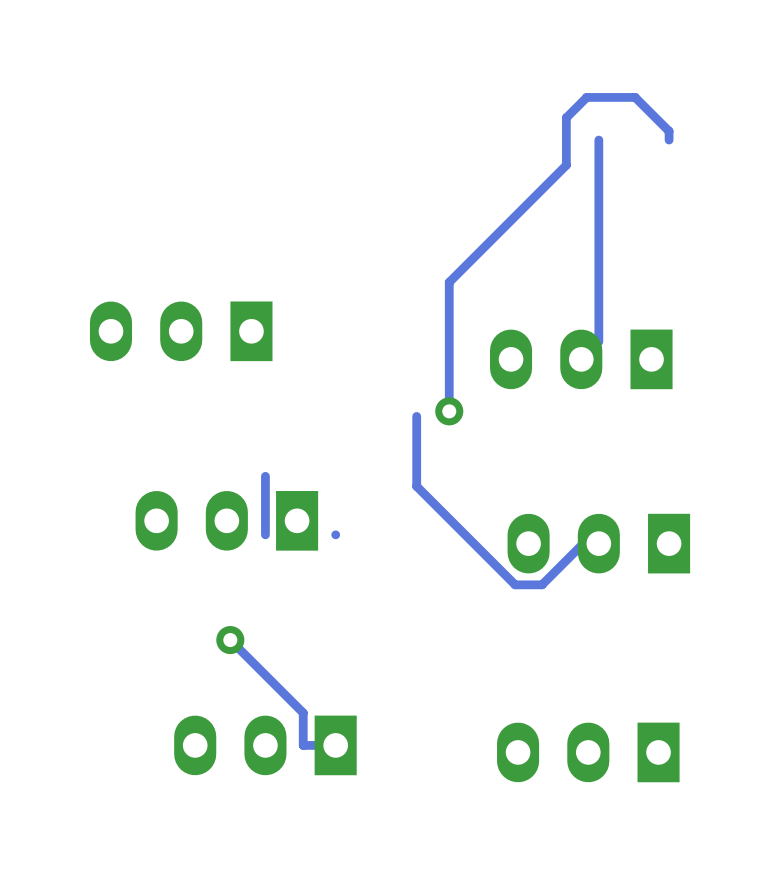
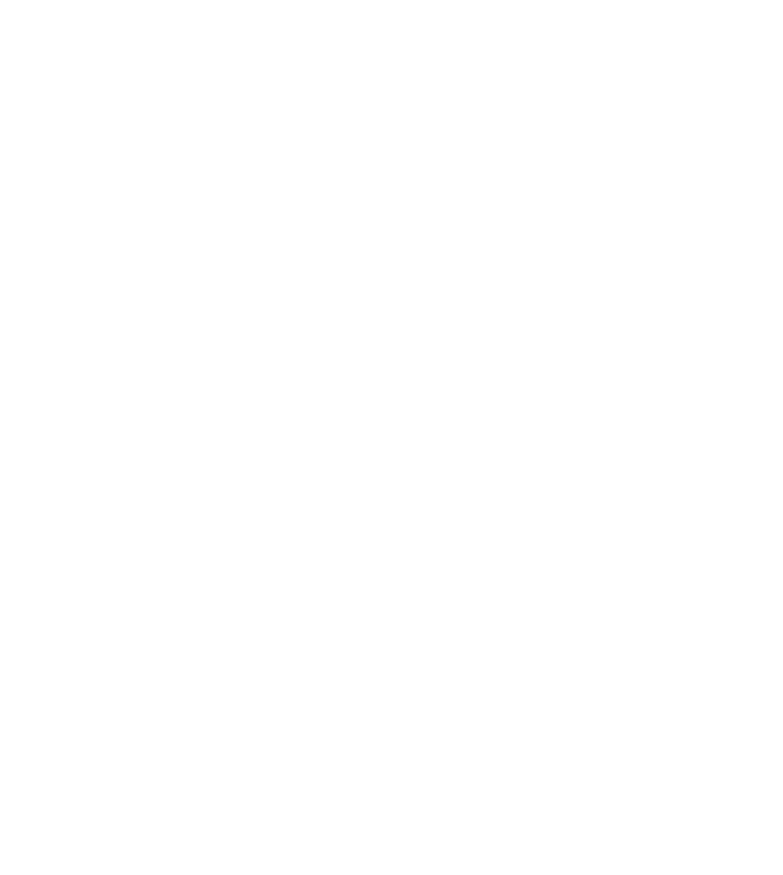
track: (598, 140) (598, 341) -> none
track: (669, 140) (669, 131) (635, 97) (586, 97) (566, 117) (566, 165) (449, 282) (449, 411) -> none
part: (181, 331) -> none
part: (581, 359) -> none
via: (449, 411) -> none
track: (416, 416) (416, 486) (515, 584) (542, 584) (598, 528) -> none
track: (265, 476) (265, 534) -> none
part: (226, 520) -> none
part: (598, 543) -> none
track: (230, 640) (303, 712) (303, 745) (335, 745) -> none
via: (230, 640) -> none
part: (265, 745) -> none
part: (588, 752) -> none

